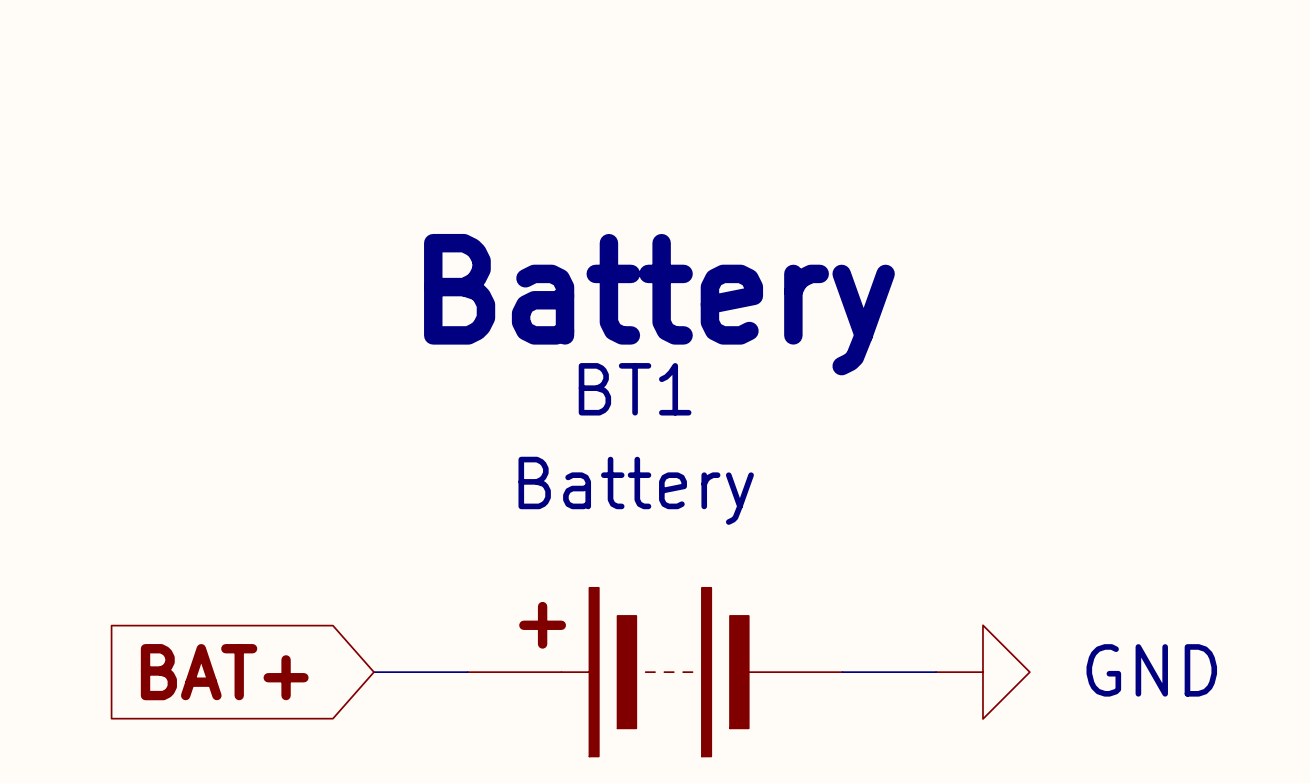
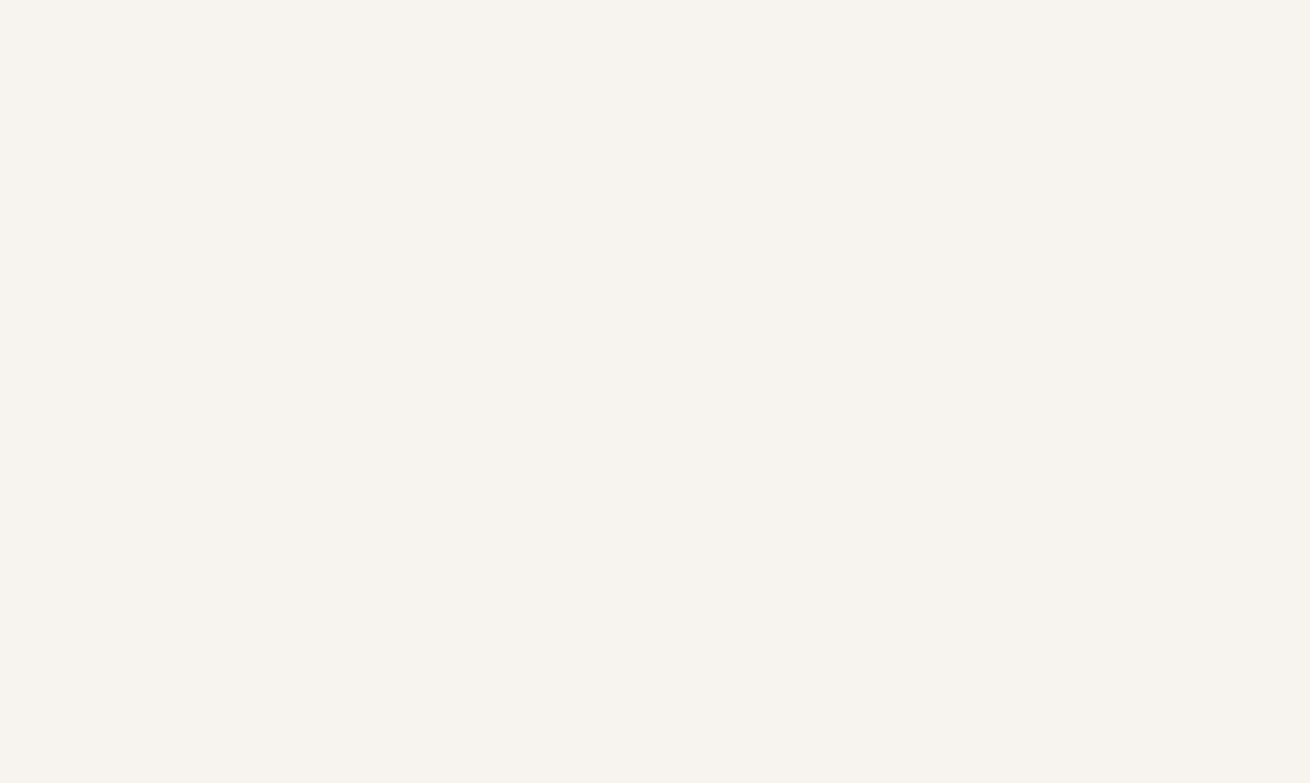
text: Battery (659, 304) -> none
global label: BAT+ (224, 672) -> none
wire: (373, 672) (467, 672) -> none
BT1: Battery (655, 672) -> none
wire: (842, 672) (936, 672) -> none
power symbol: GND (982, 672) -> none

